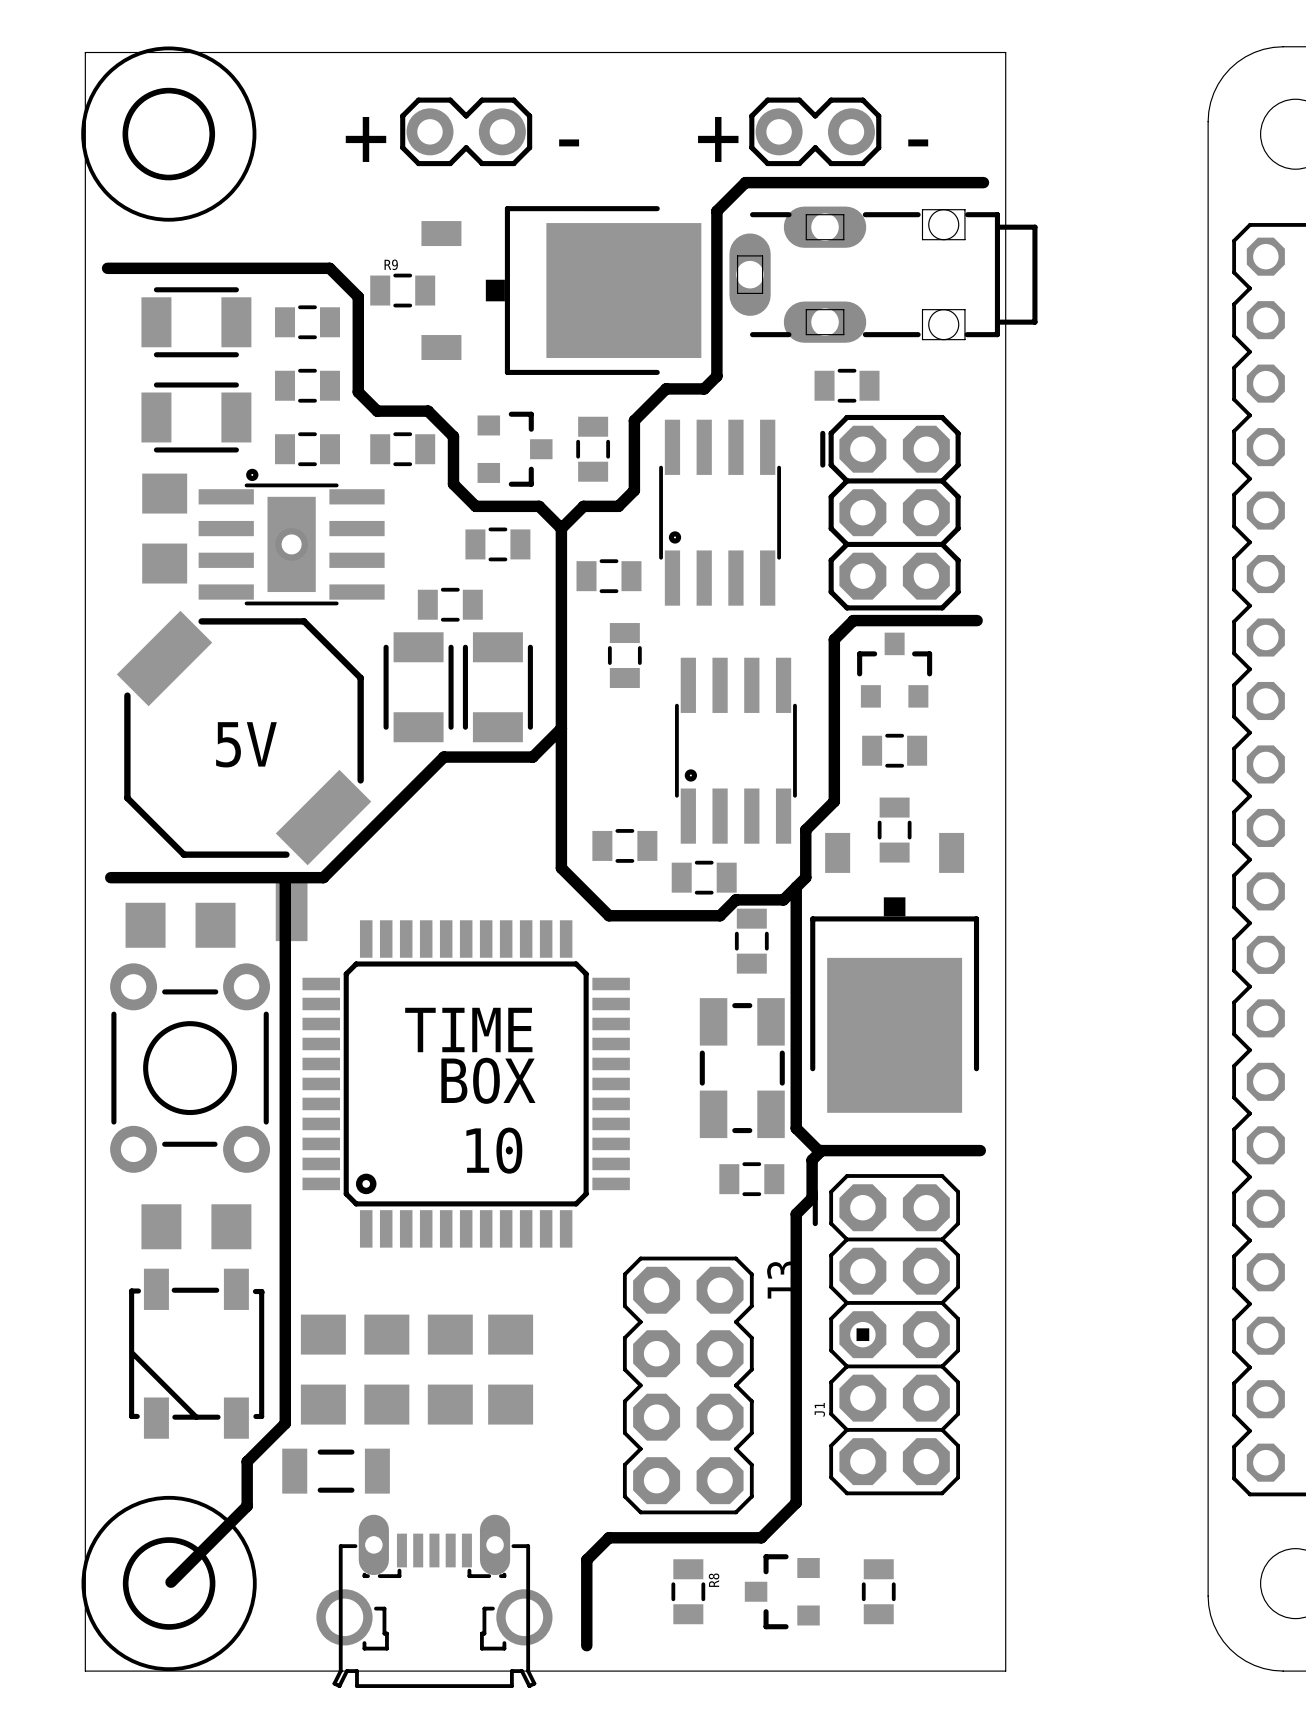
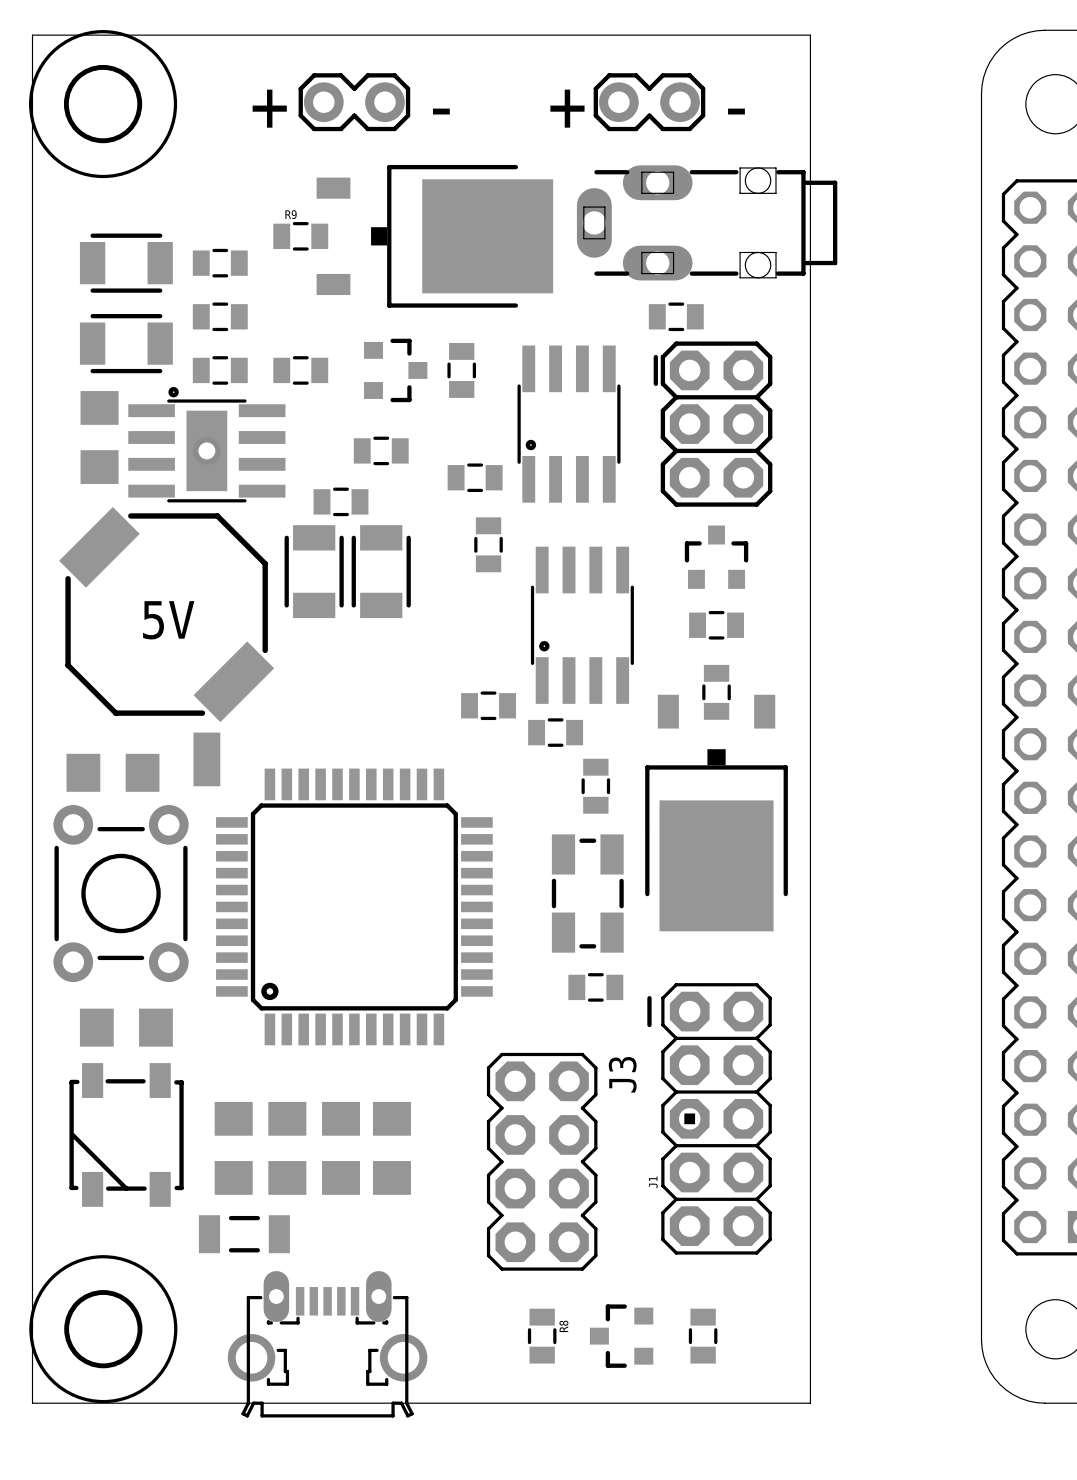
line: (983, 182) (745, 182) (716, 211) (716, 376) (704, 388) (666, 388) (634, 420) (634, 490) (618, 506) (583, 506) (561, 528) -> none
line: (107, 268) (329, 268) (358, 296) (358, 392) (377, 411) (428, 411) (453, 436) (453, 484) (475, 506) (539, 506) (561, 528) -> none
line: (561, 528) (561, 868) (608, 915) (720, 915) (735, 899) (783, 899) (805, 877) (805, 830) (834, 801) (834, 639) (853, 620) (977, 620) -> none
line: (561, 728) (532, 757) (443, 757) (323, 877) (110, 877) -> none
line: (285, 877) (285, 1423) (247, 1461) (247, 1506) (171, 1582) -> none
line: (796, 887) (796, 1128) (818, 1150) (980, 1150) -> none
text: TIME (468, 1030) -> none
text: BOX (488, 1080) -> none
text: 10 (494, 1150) -> none
line: (821, 1150) (812, 1160) (812, 1198) (796, 1214) (796, 1502) (761, 1537) (608, 1537) (586, 1560) (586, 1645) -> none

